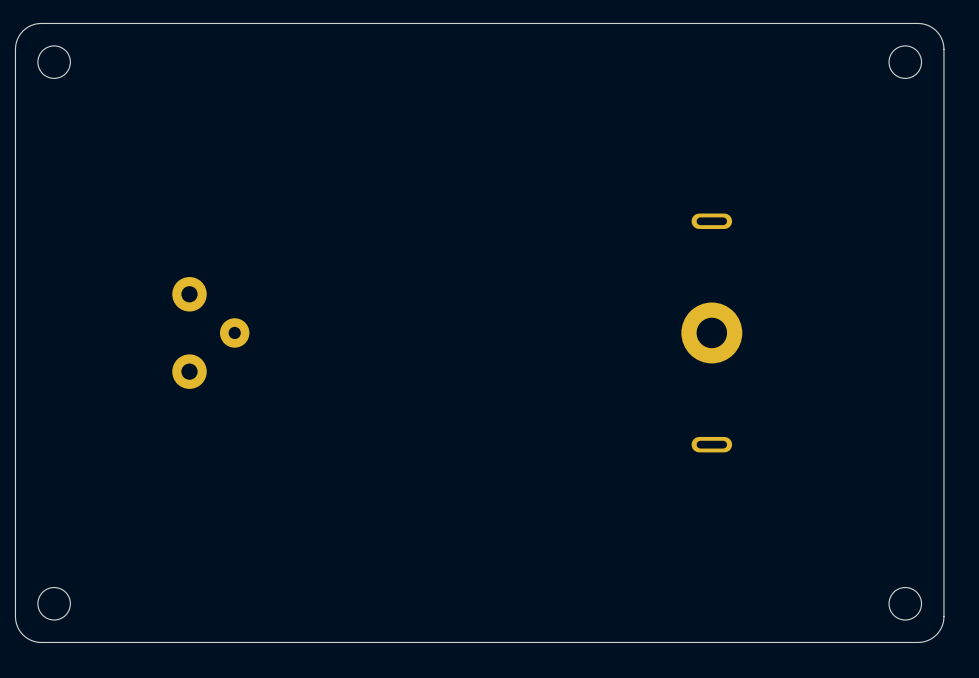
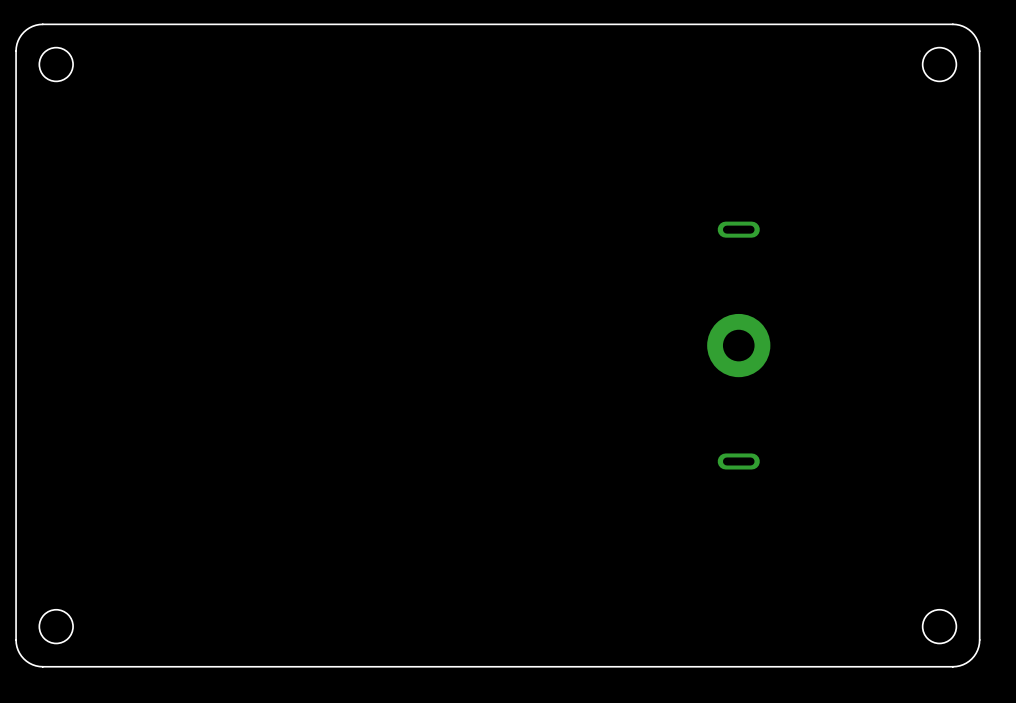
part: (210, 332) -> none

